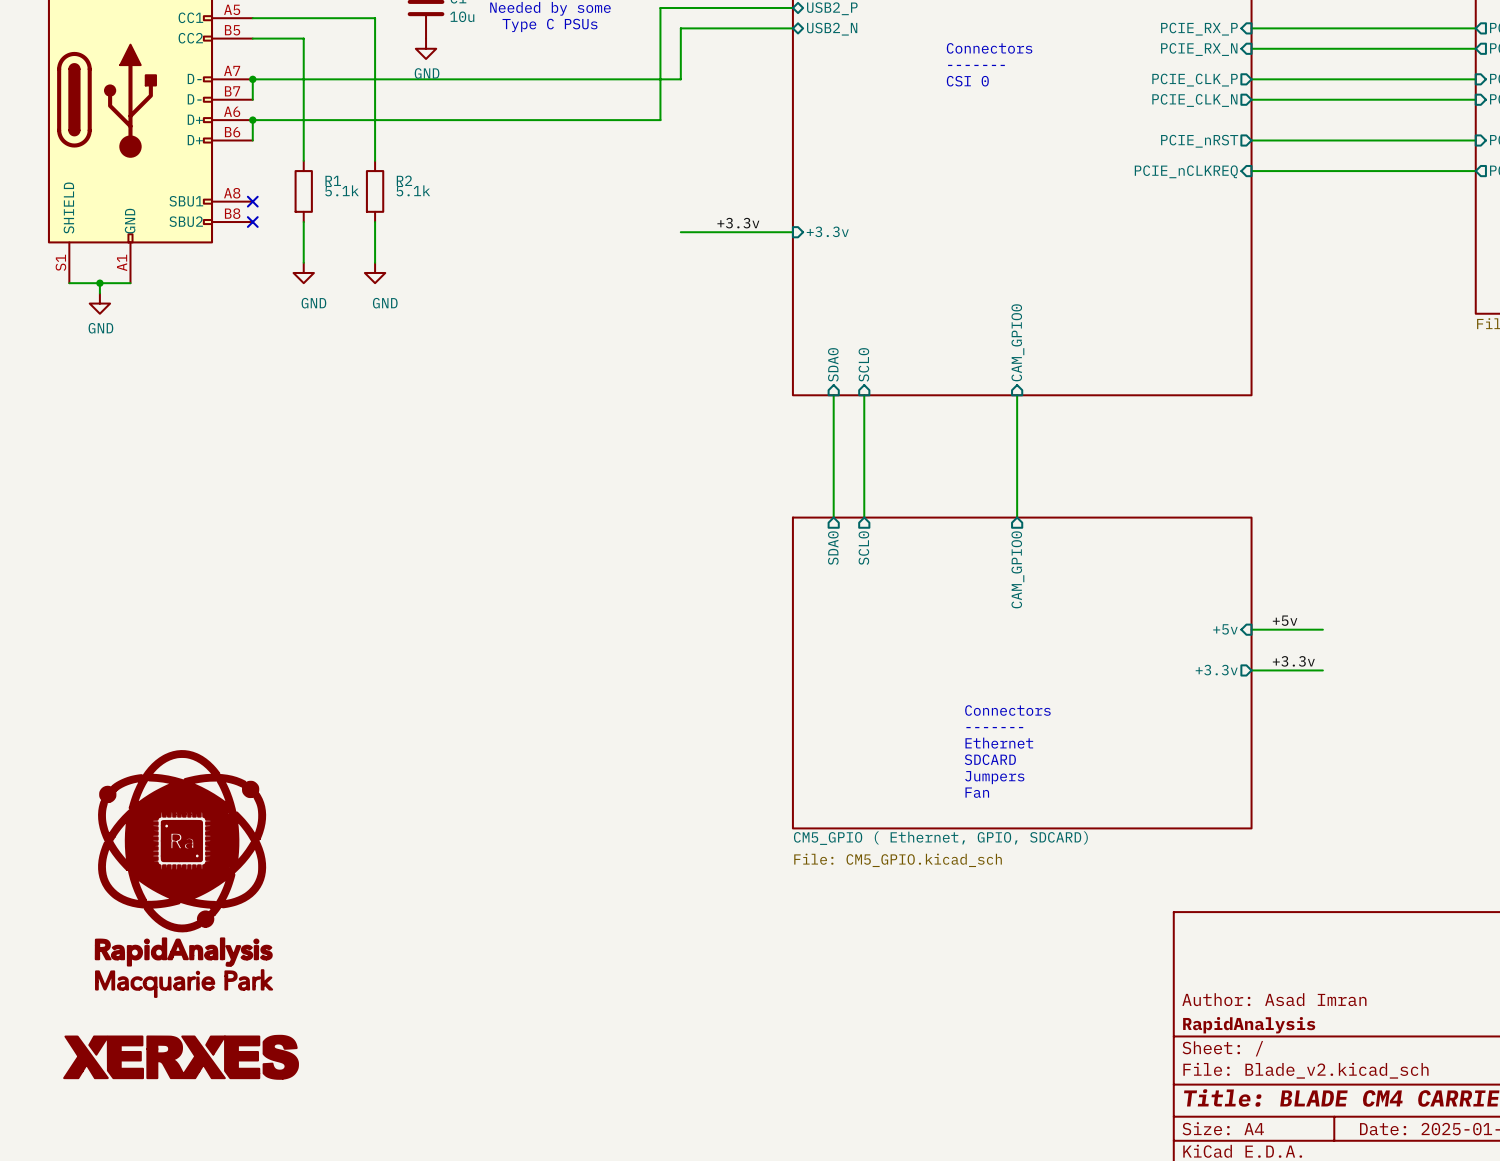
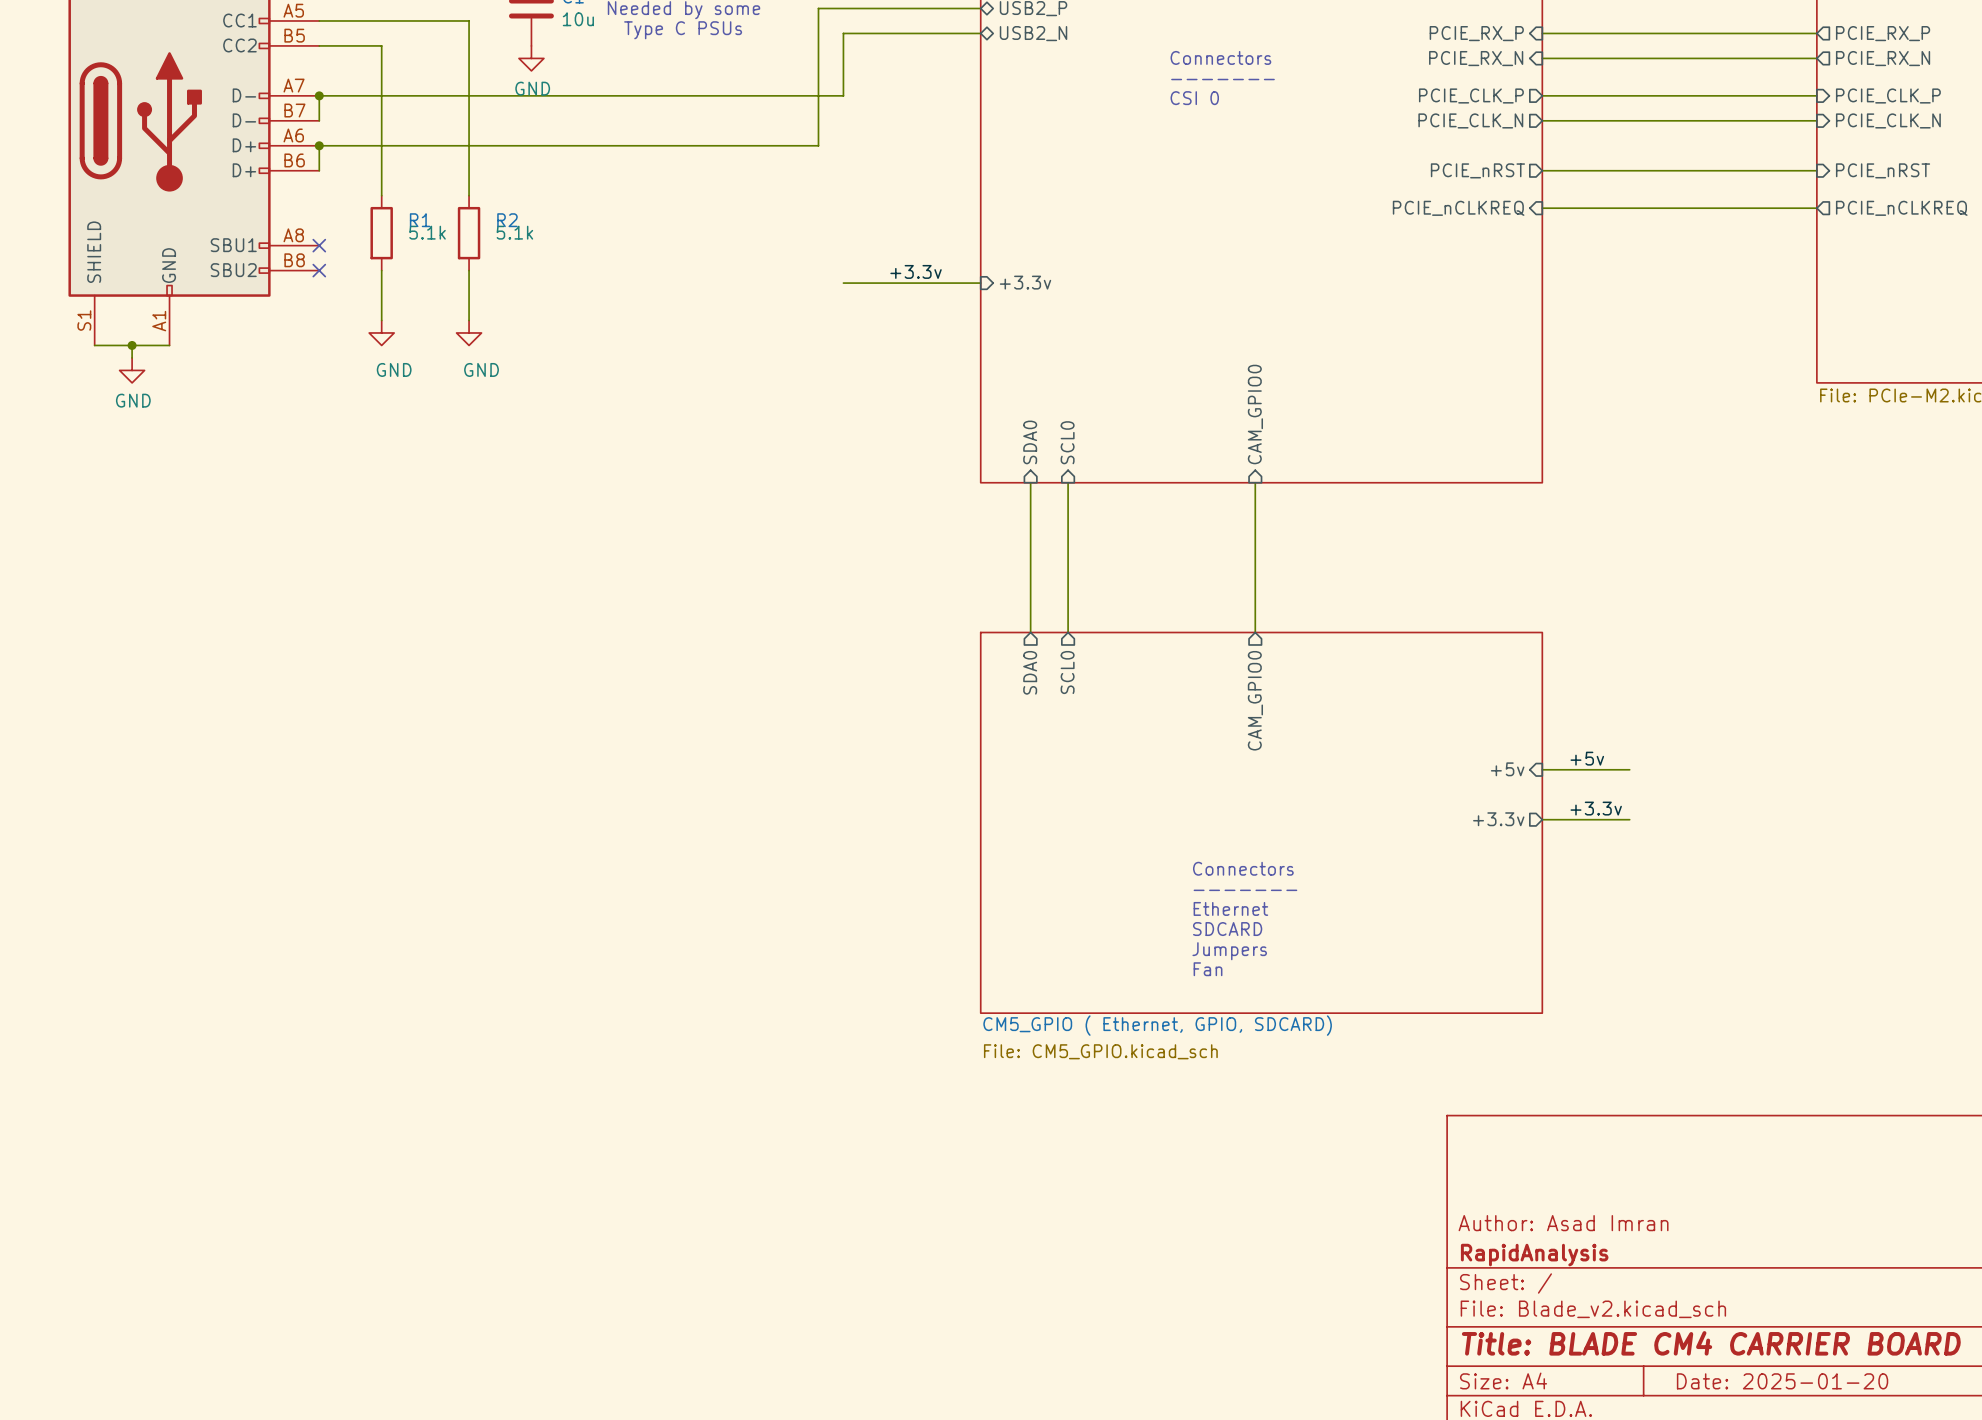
drawing: [95, 751, 273, 997] -> none
drawing: [64, 1035, 299, 1079] -> none

